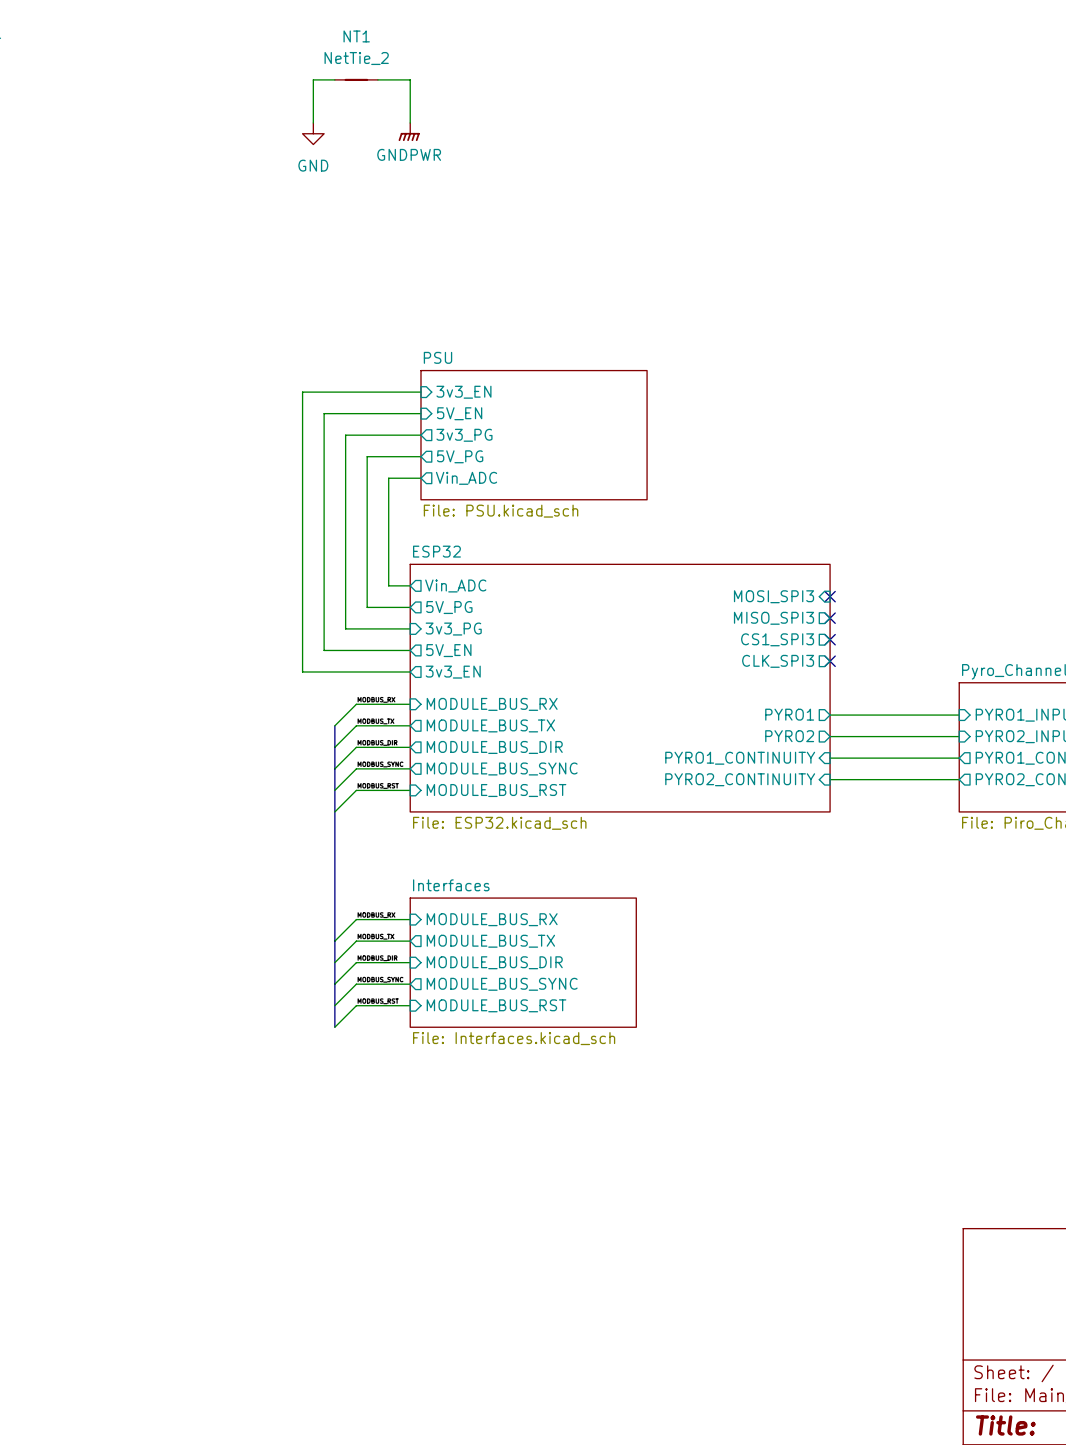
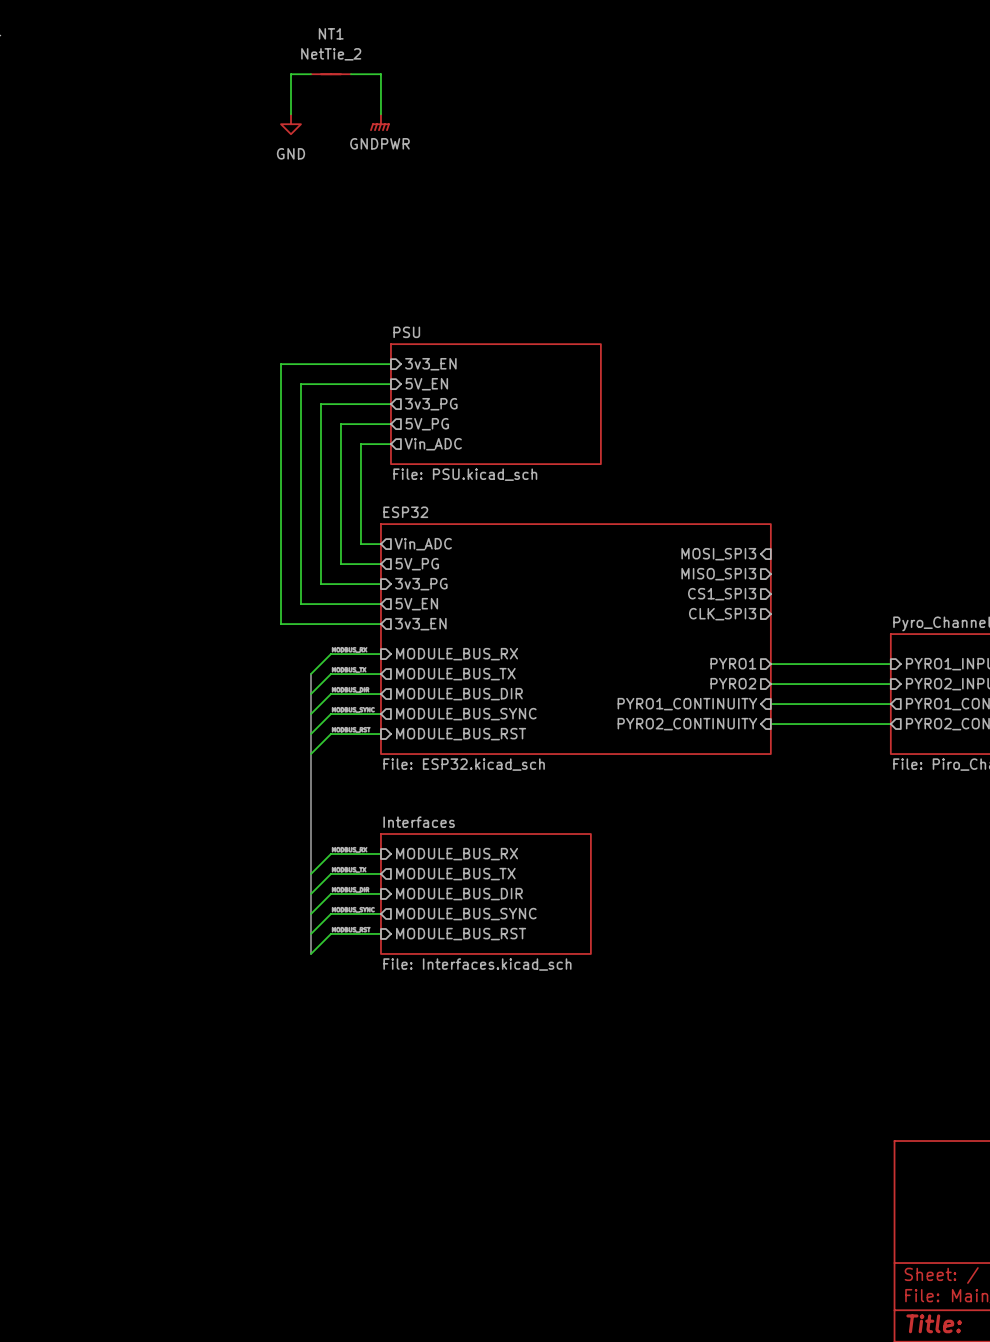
no-connect mark: (830, 596) -> none
no-connect mark: (830, 618) -> none
no-connect mark: (830, 639) -> none
no-connect mark: (830, 661) -> none

